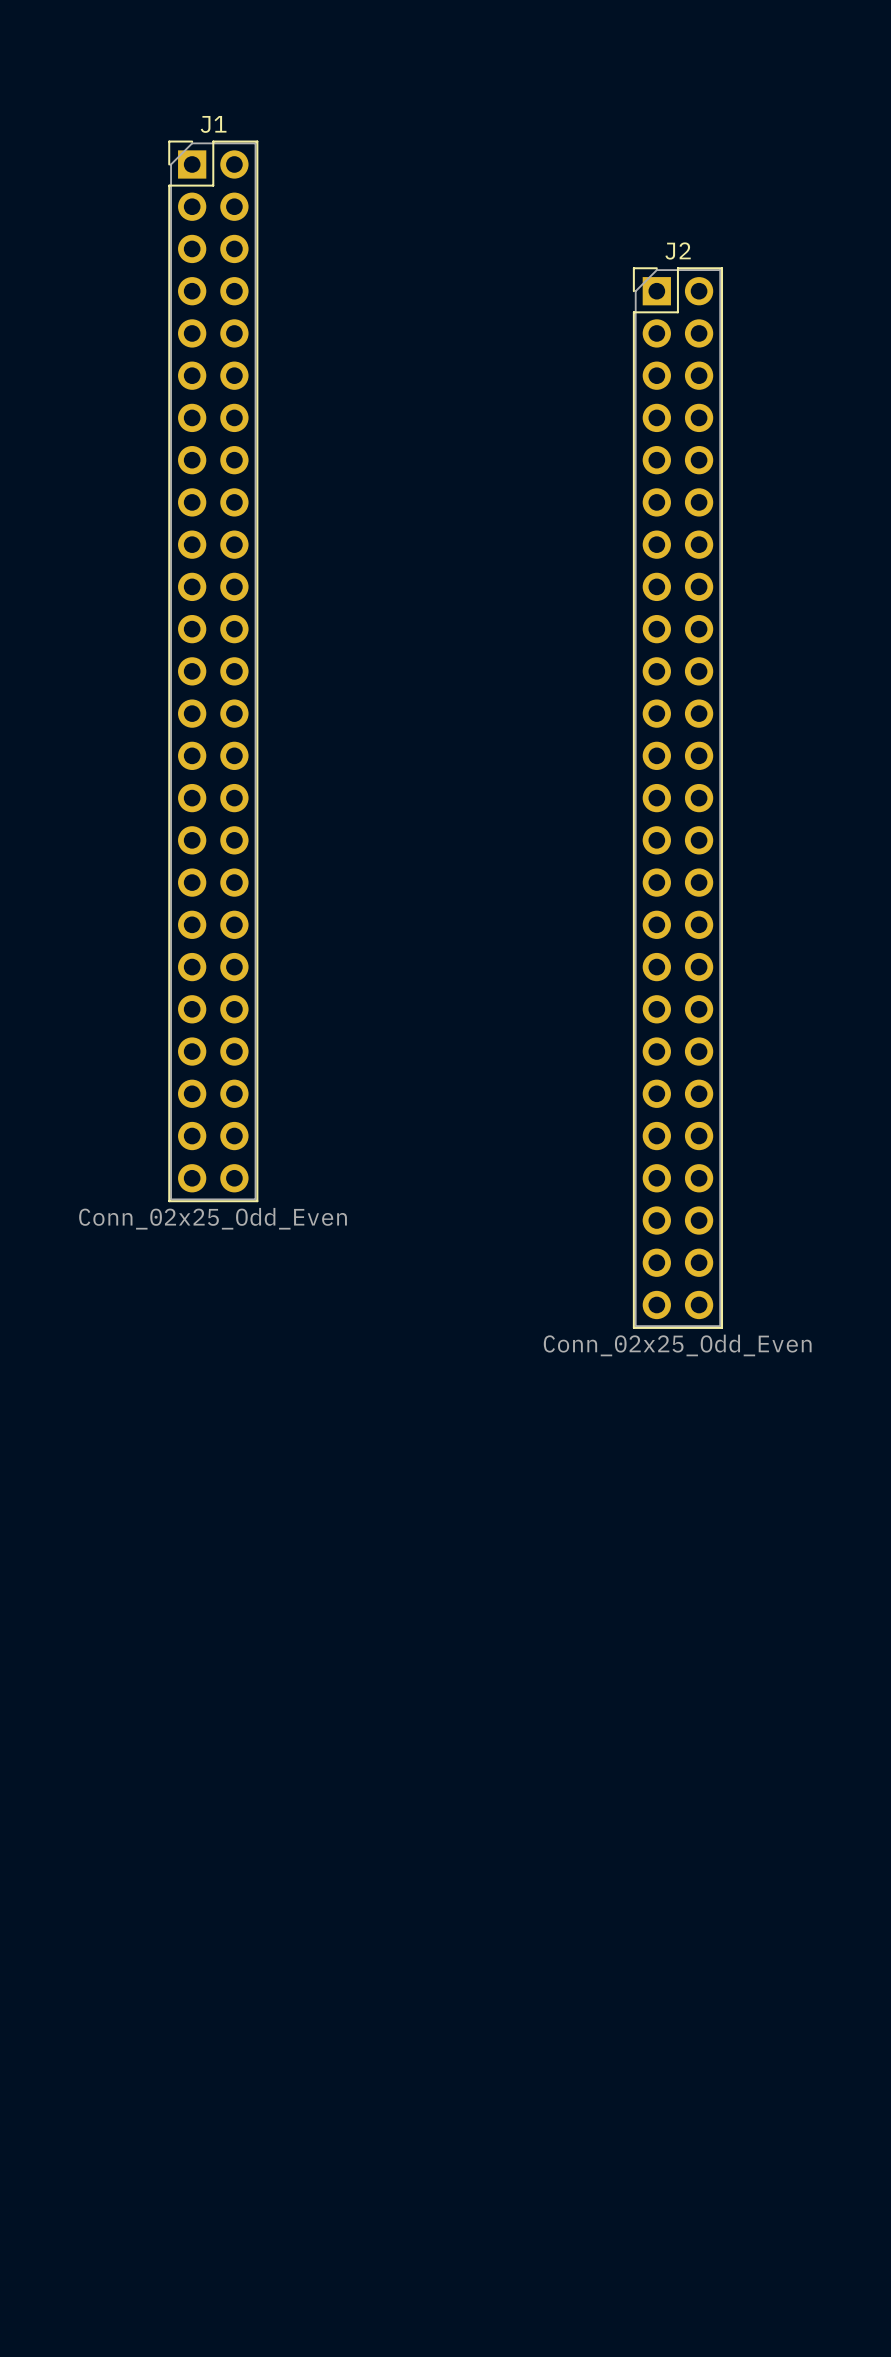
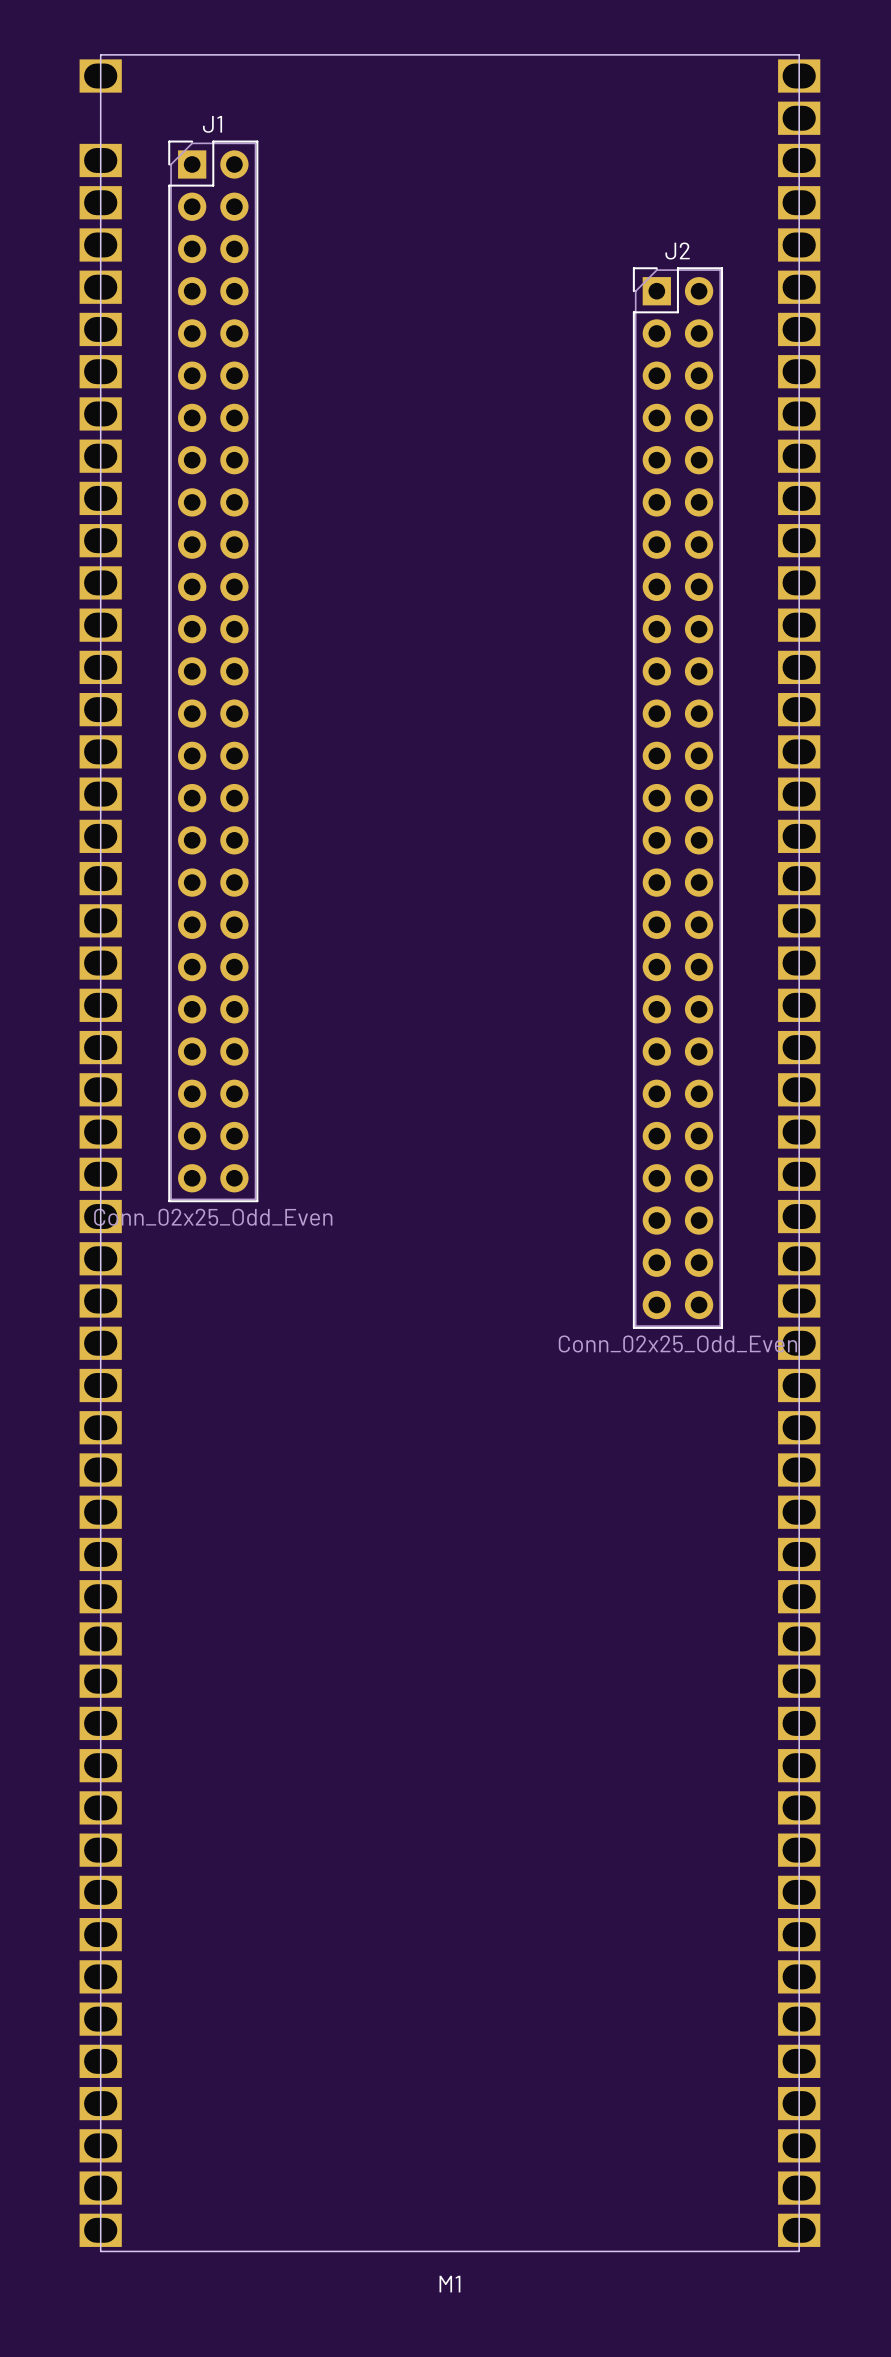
M1: none -> (449, 1153)

